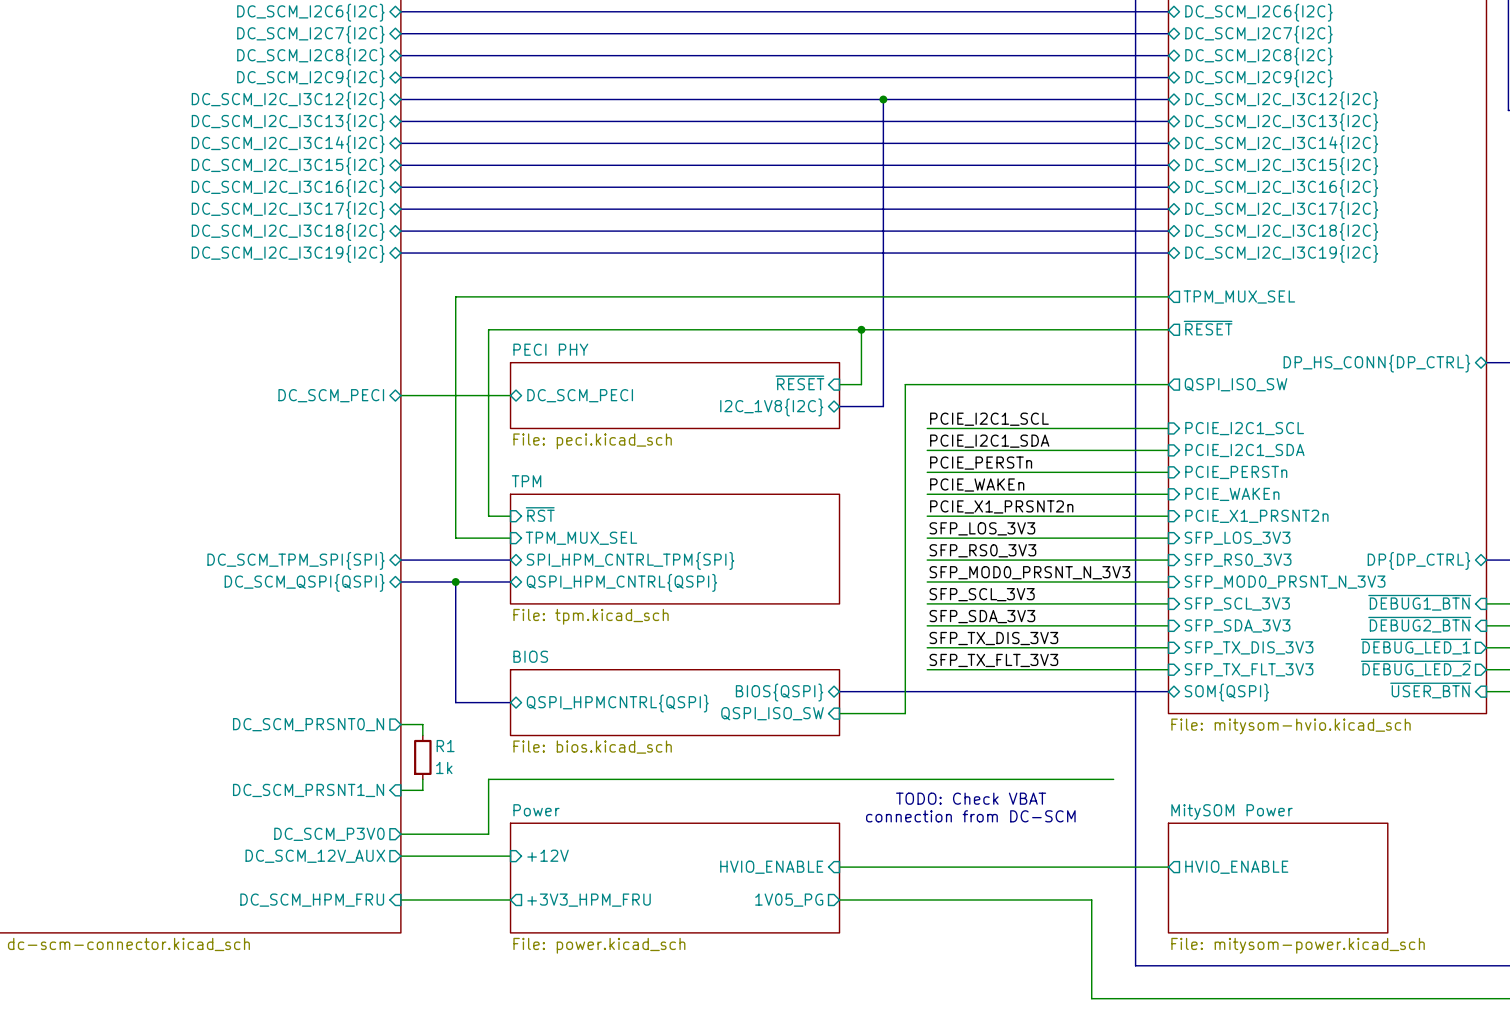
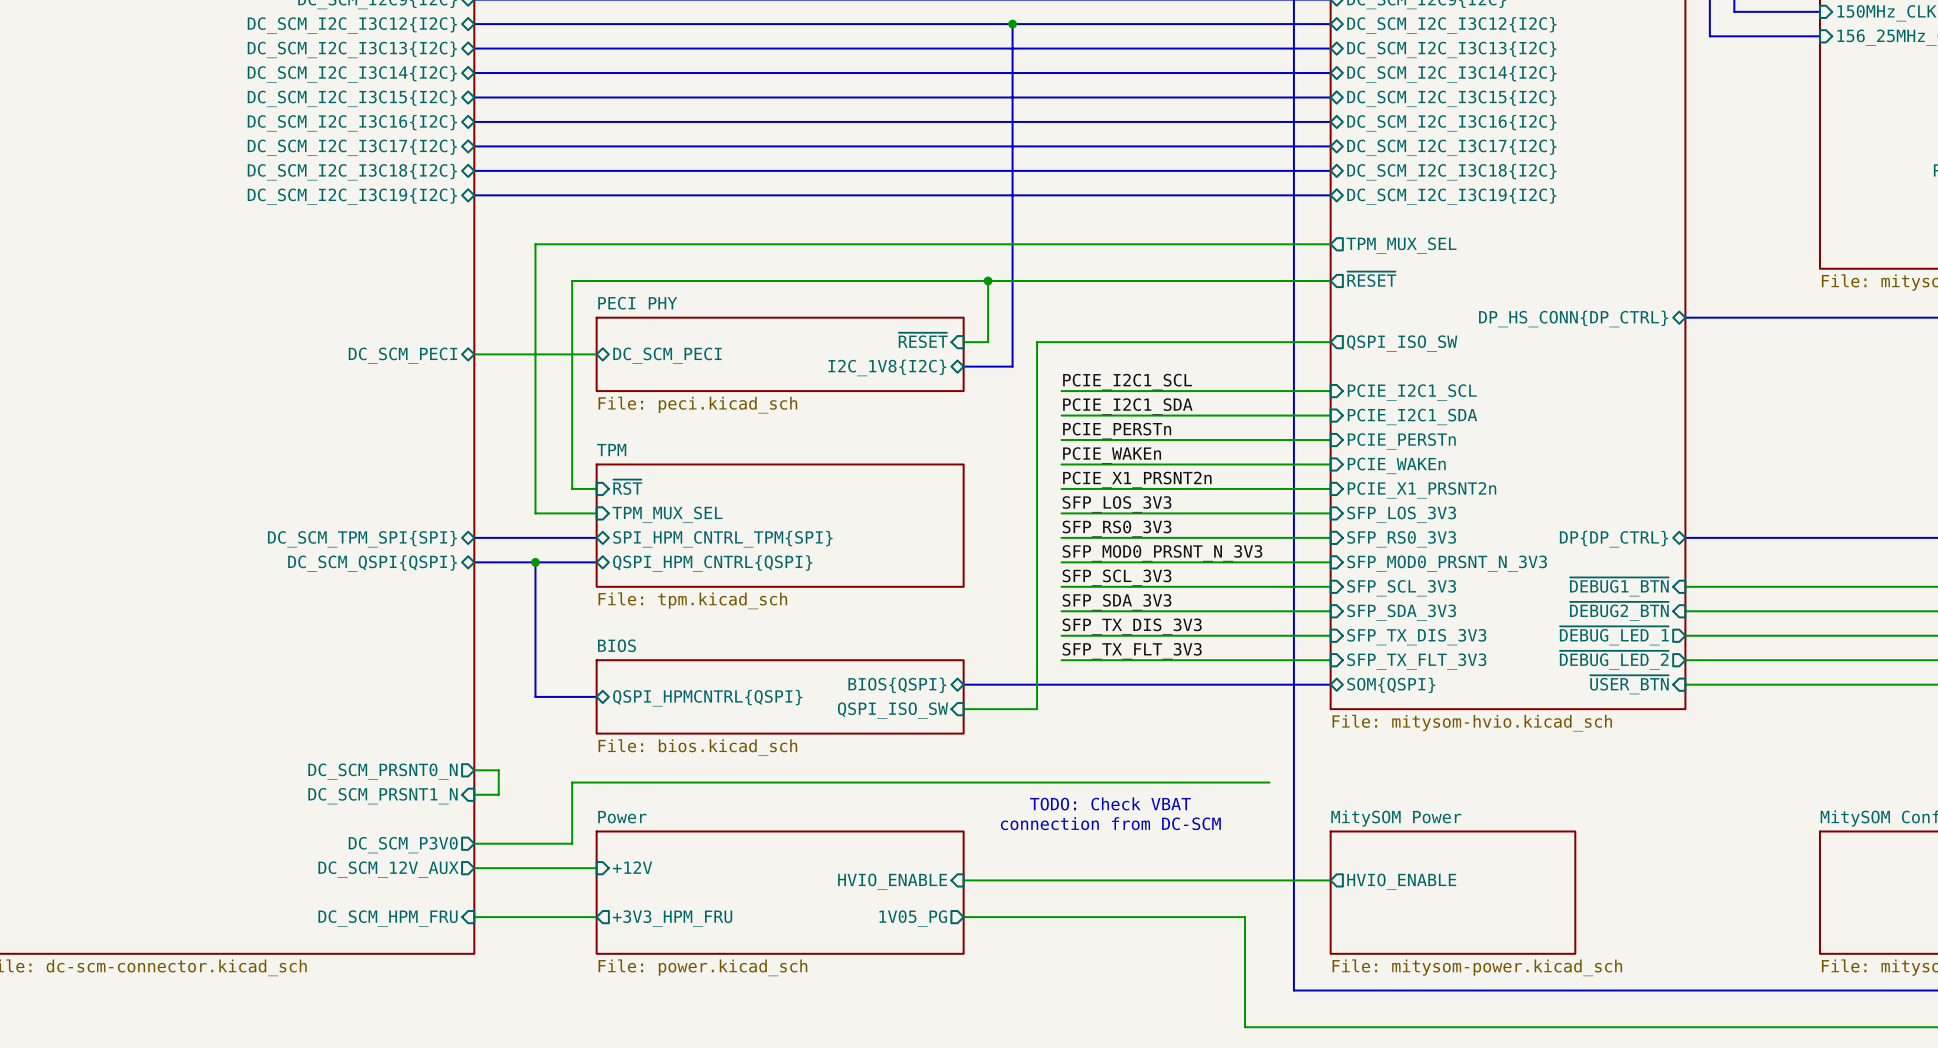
sheet pin position: DC_SCM_PRSNT0_N (308, 724) -> DC_SCM_PRSNT0_N (383, 771)
wire: (400, 724) (422, 724) (422, 735) -> (474, 770) (498, 770) (498, 782)
R1: (422, 757) -> none

